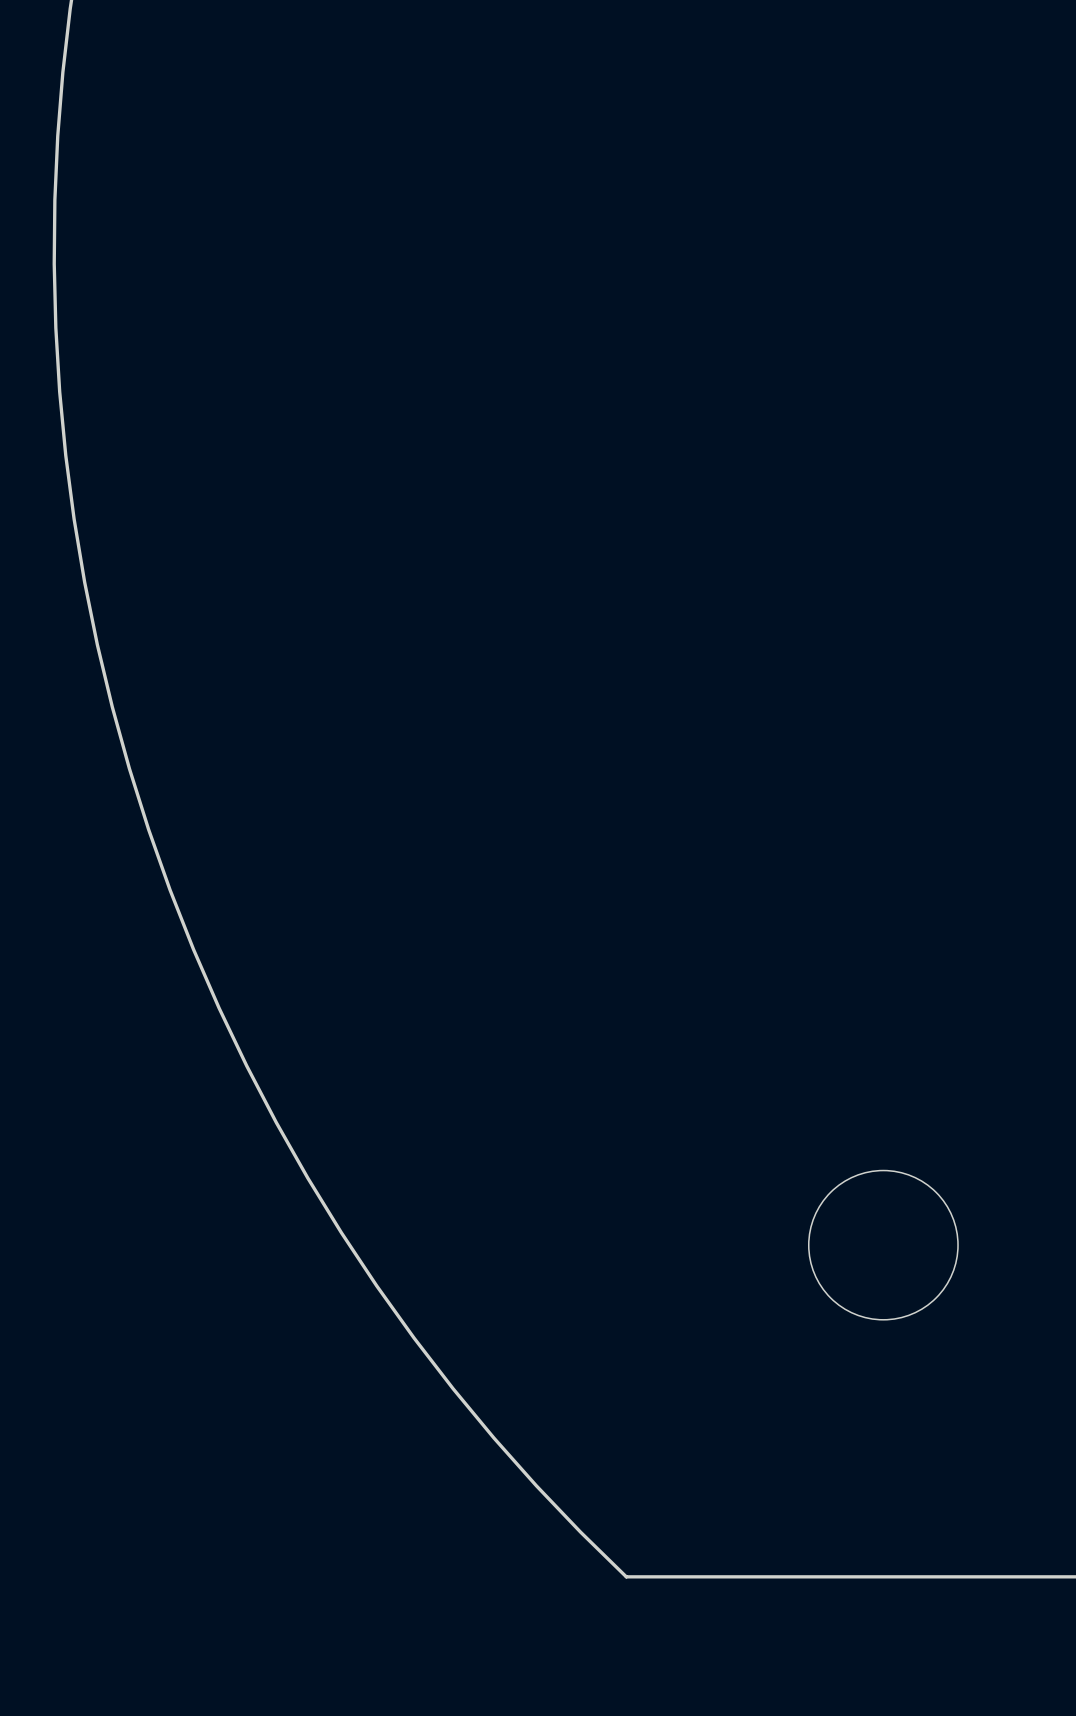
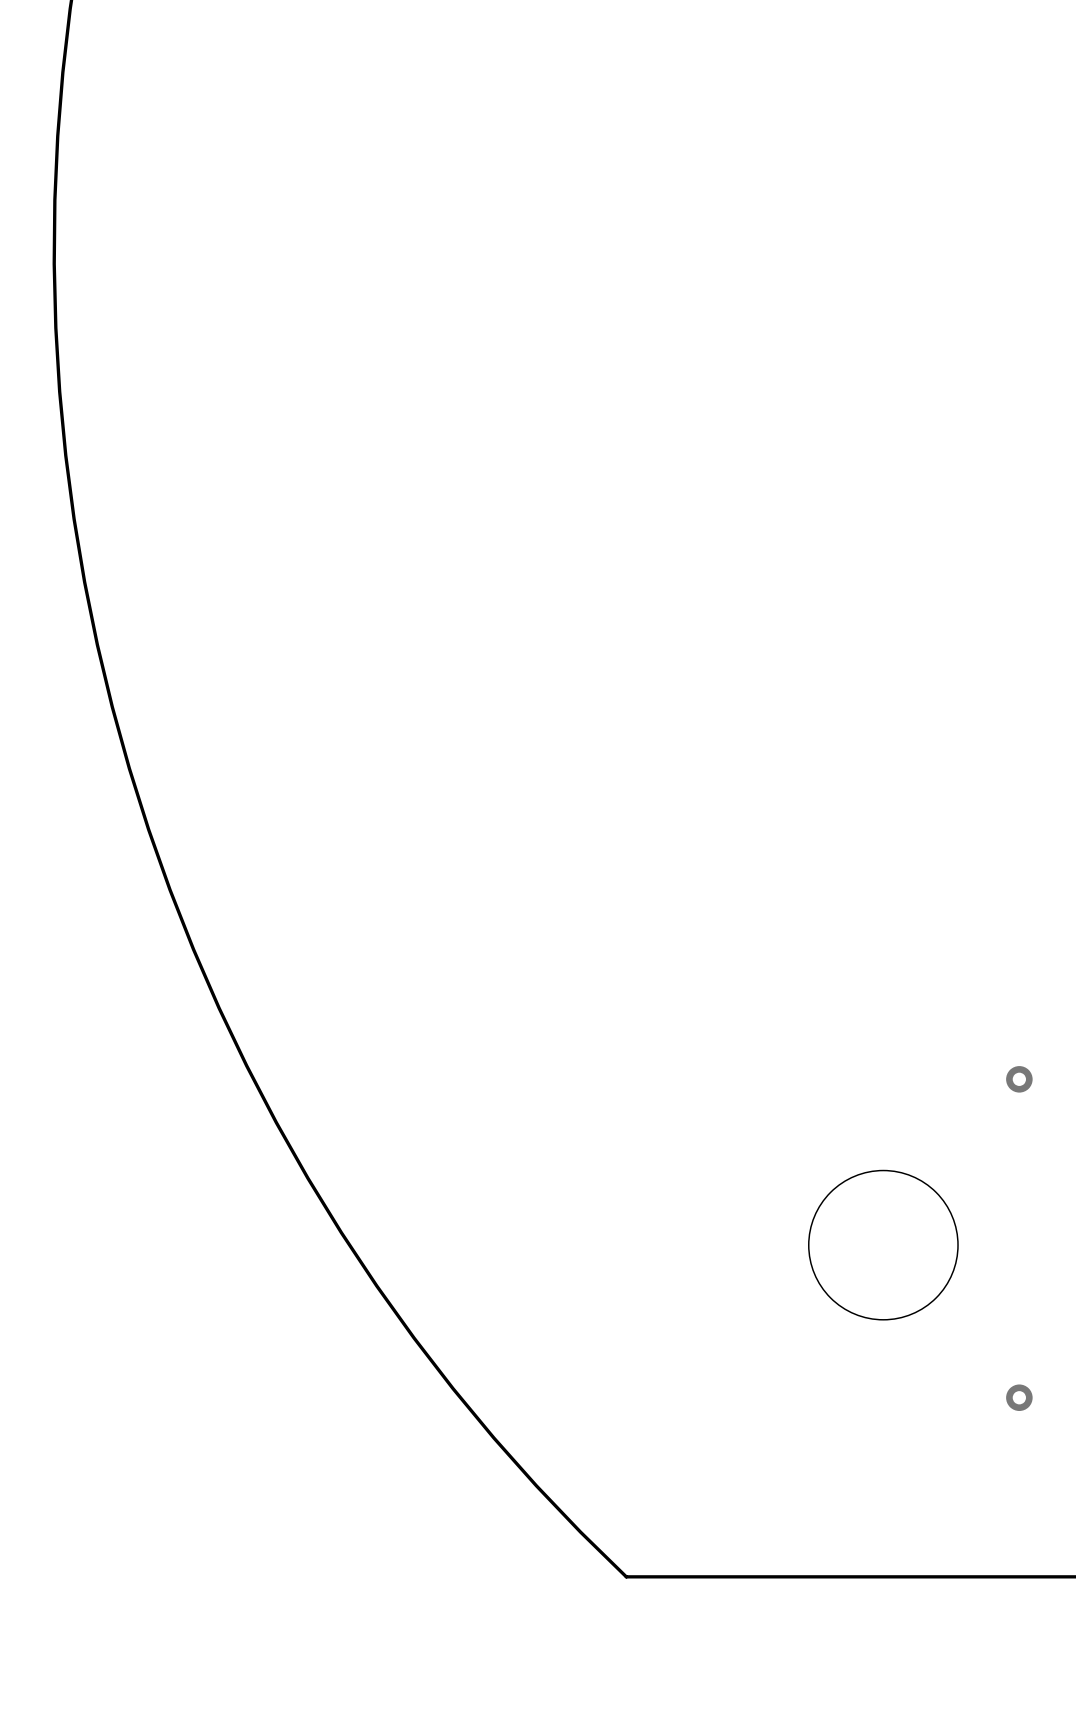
via: none -> (1019, 1079)
via: none -> (1019, 1397)

